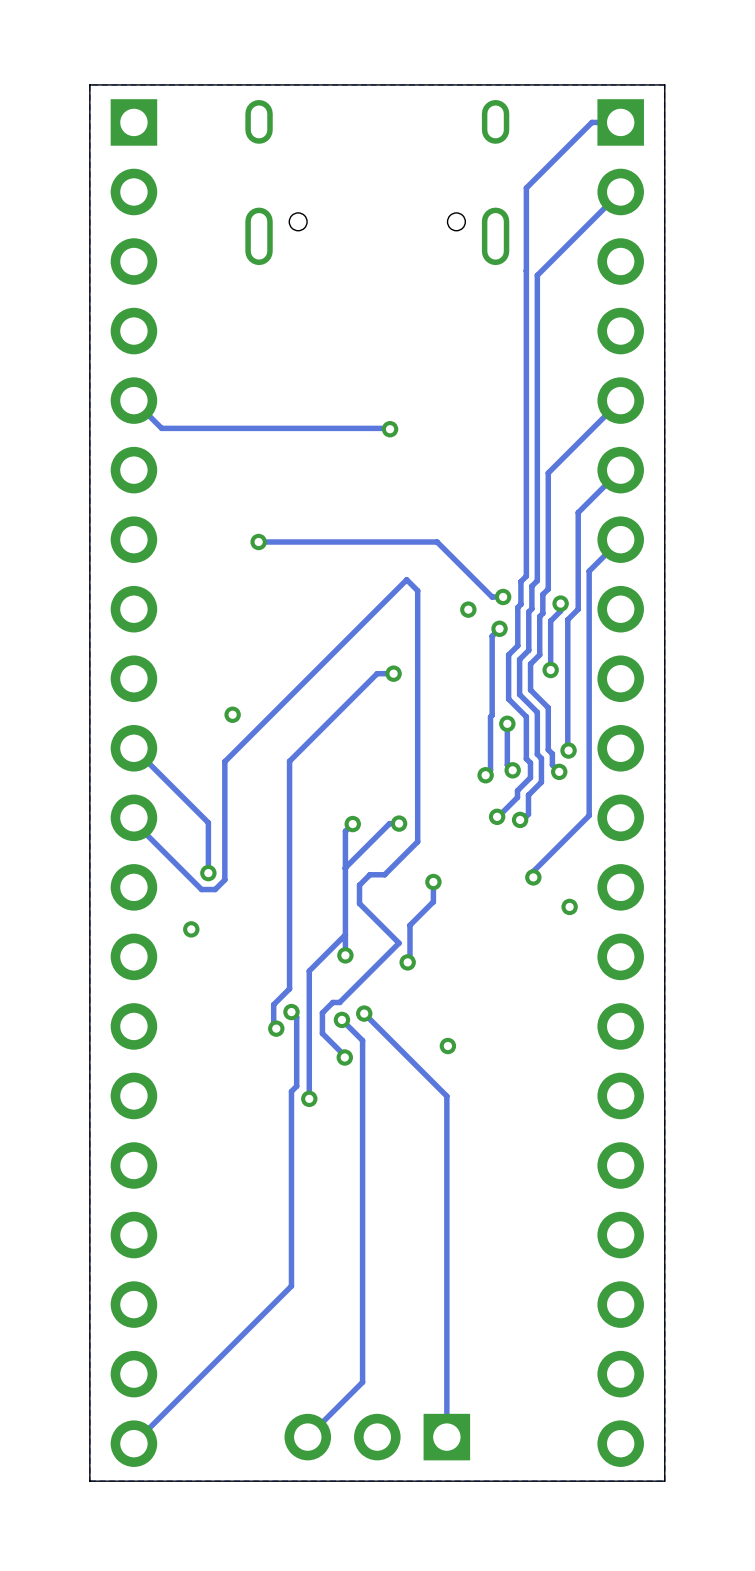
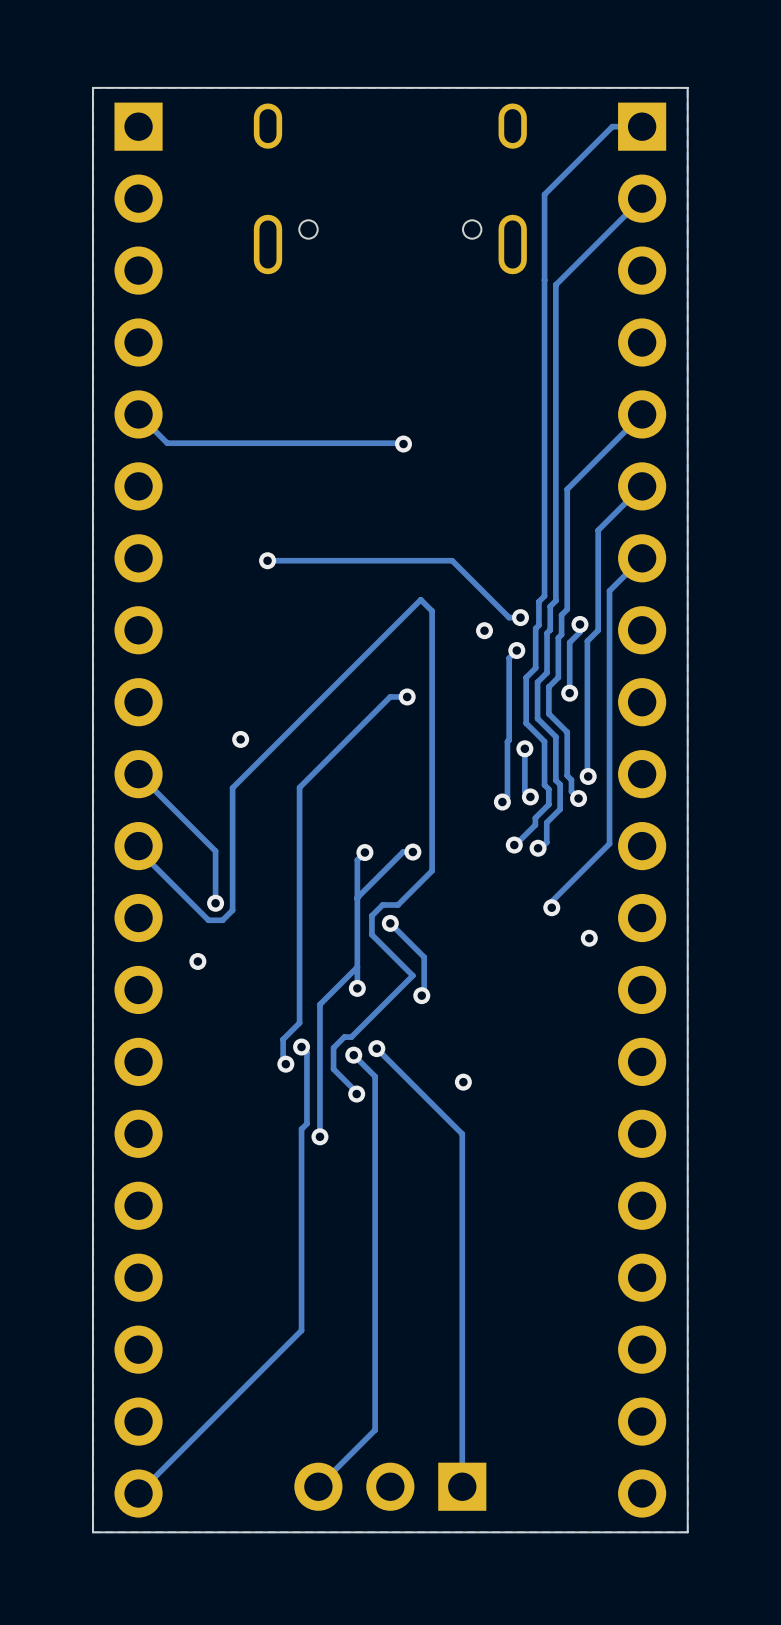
track: (433, 882) (433, 901) (409, 925) -> (390, 923) (424, 957)
via position: (433, 882) -> (390, 923)

